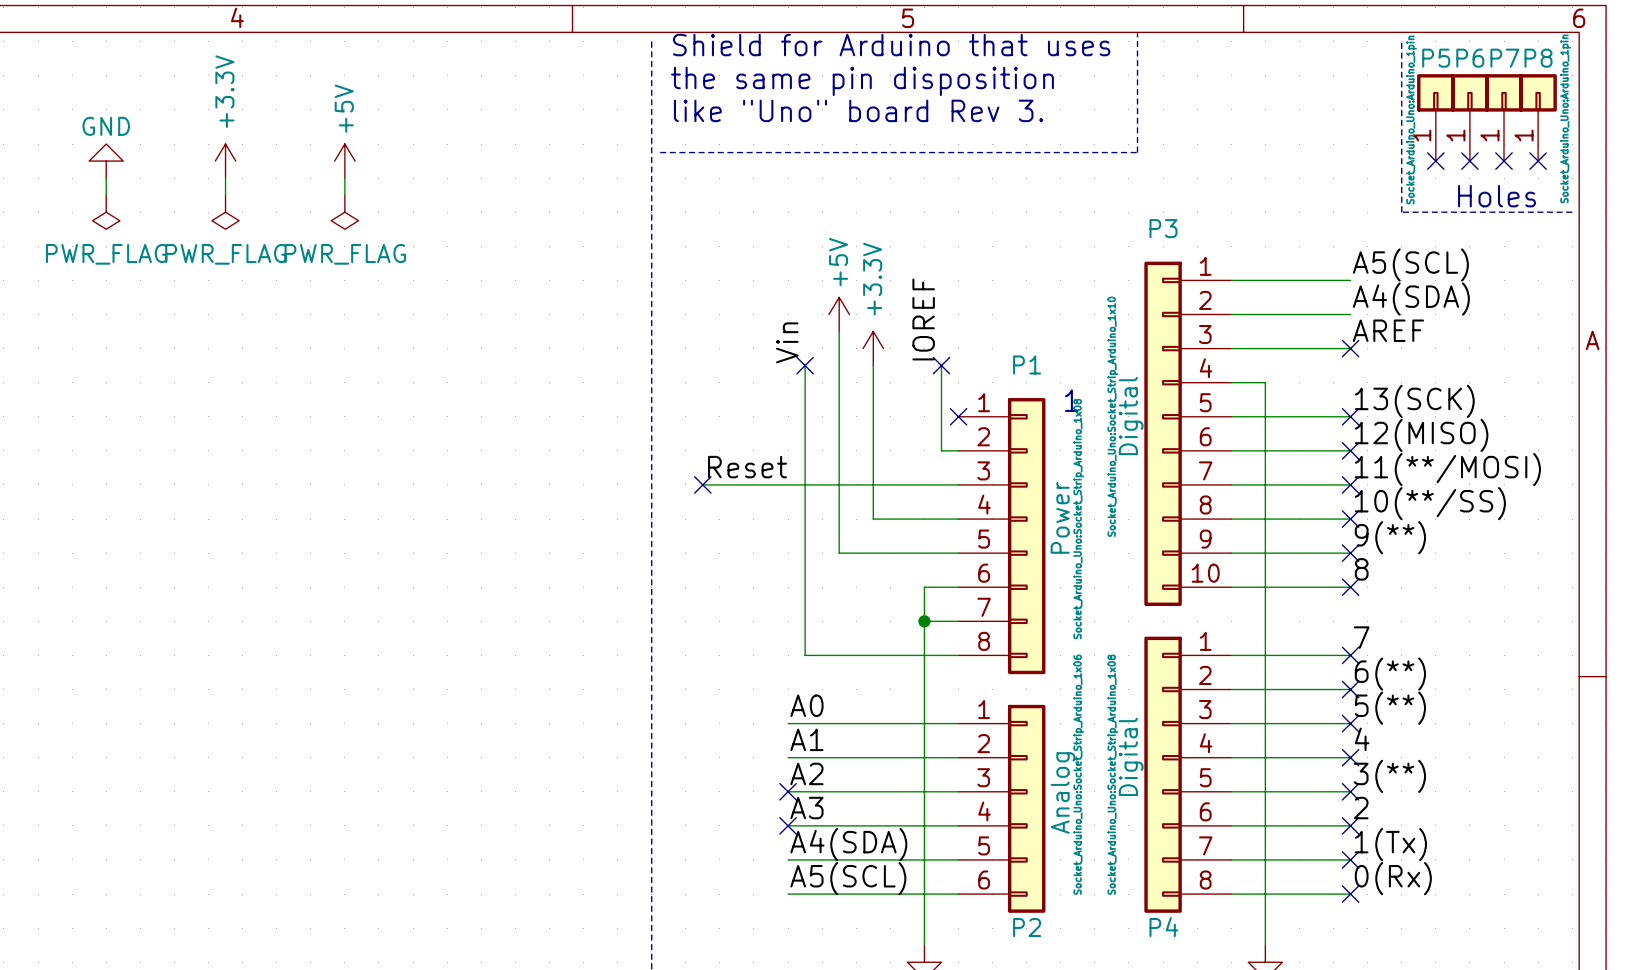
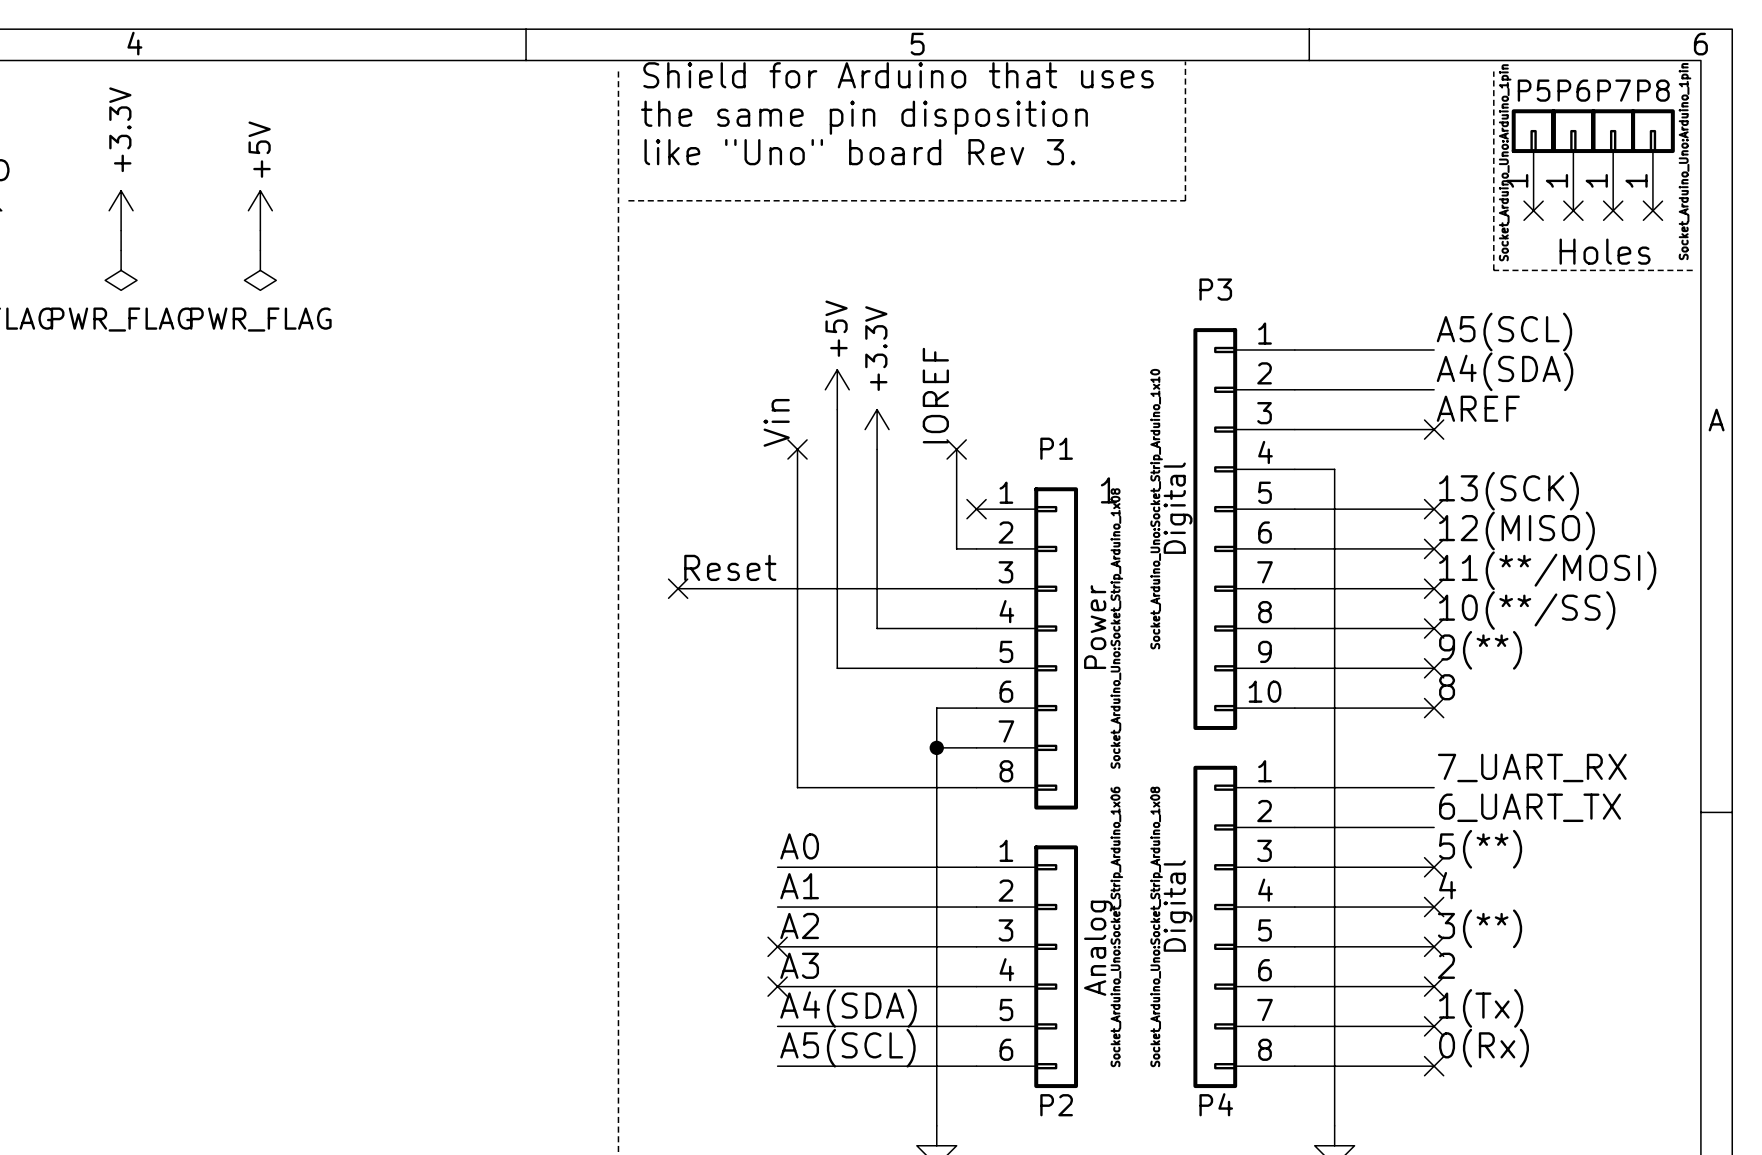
label: 7 (1361, 637) -> 7_UART_RX (1532, 767)
no-connect mark: (1350, 655) -> none
label: 6(**) (1390, 674) -> 6_UART_TX (1530, 807)
no-connect mark: (1350, 689) -> none

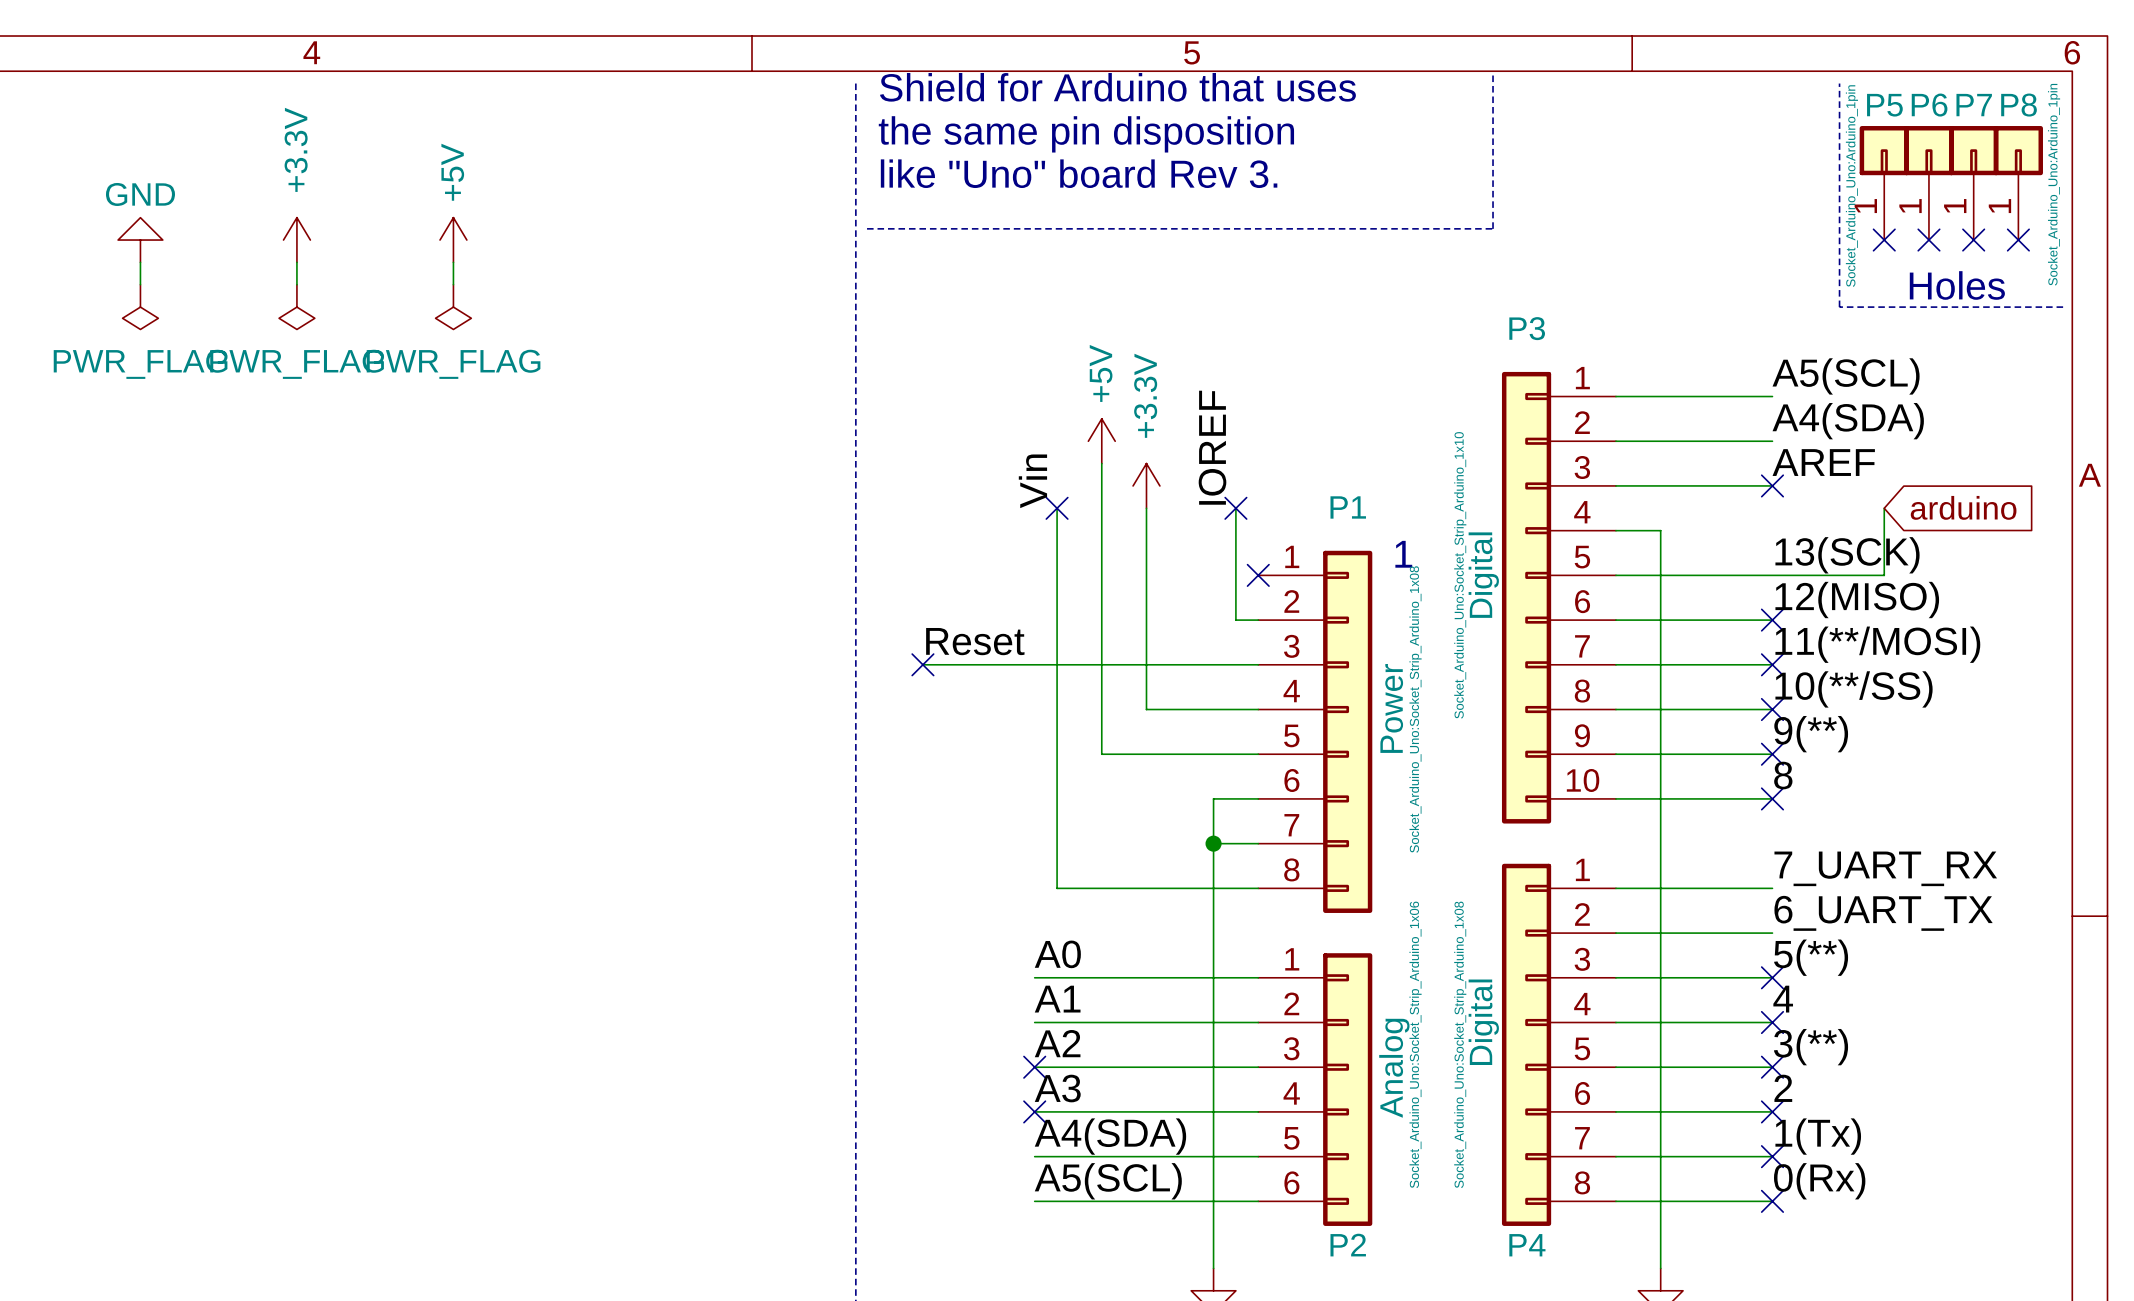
wire: none -> (1884, 508) (1884, 575) (1772, 575)
global label: none -> arduino (1963, 507)
no-connect mark: (1434, 509) -> none

